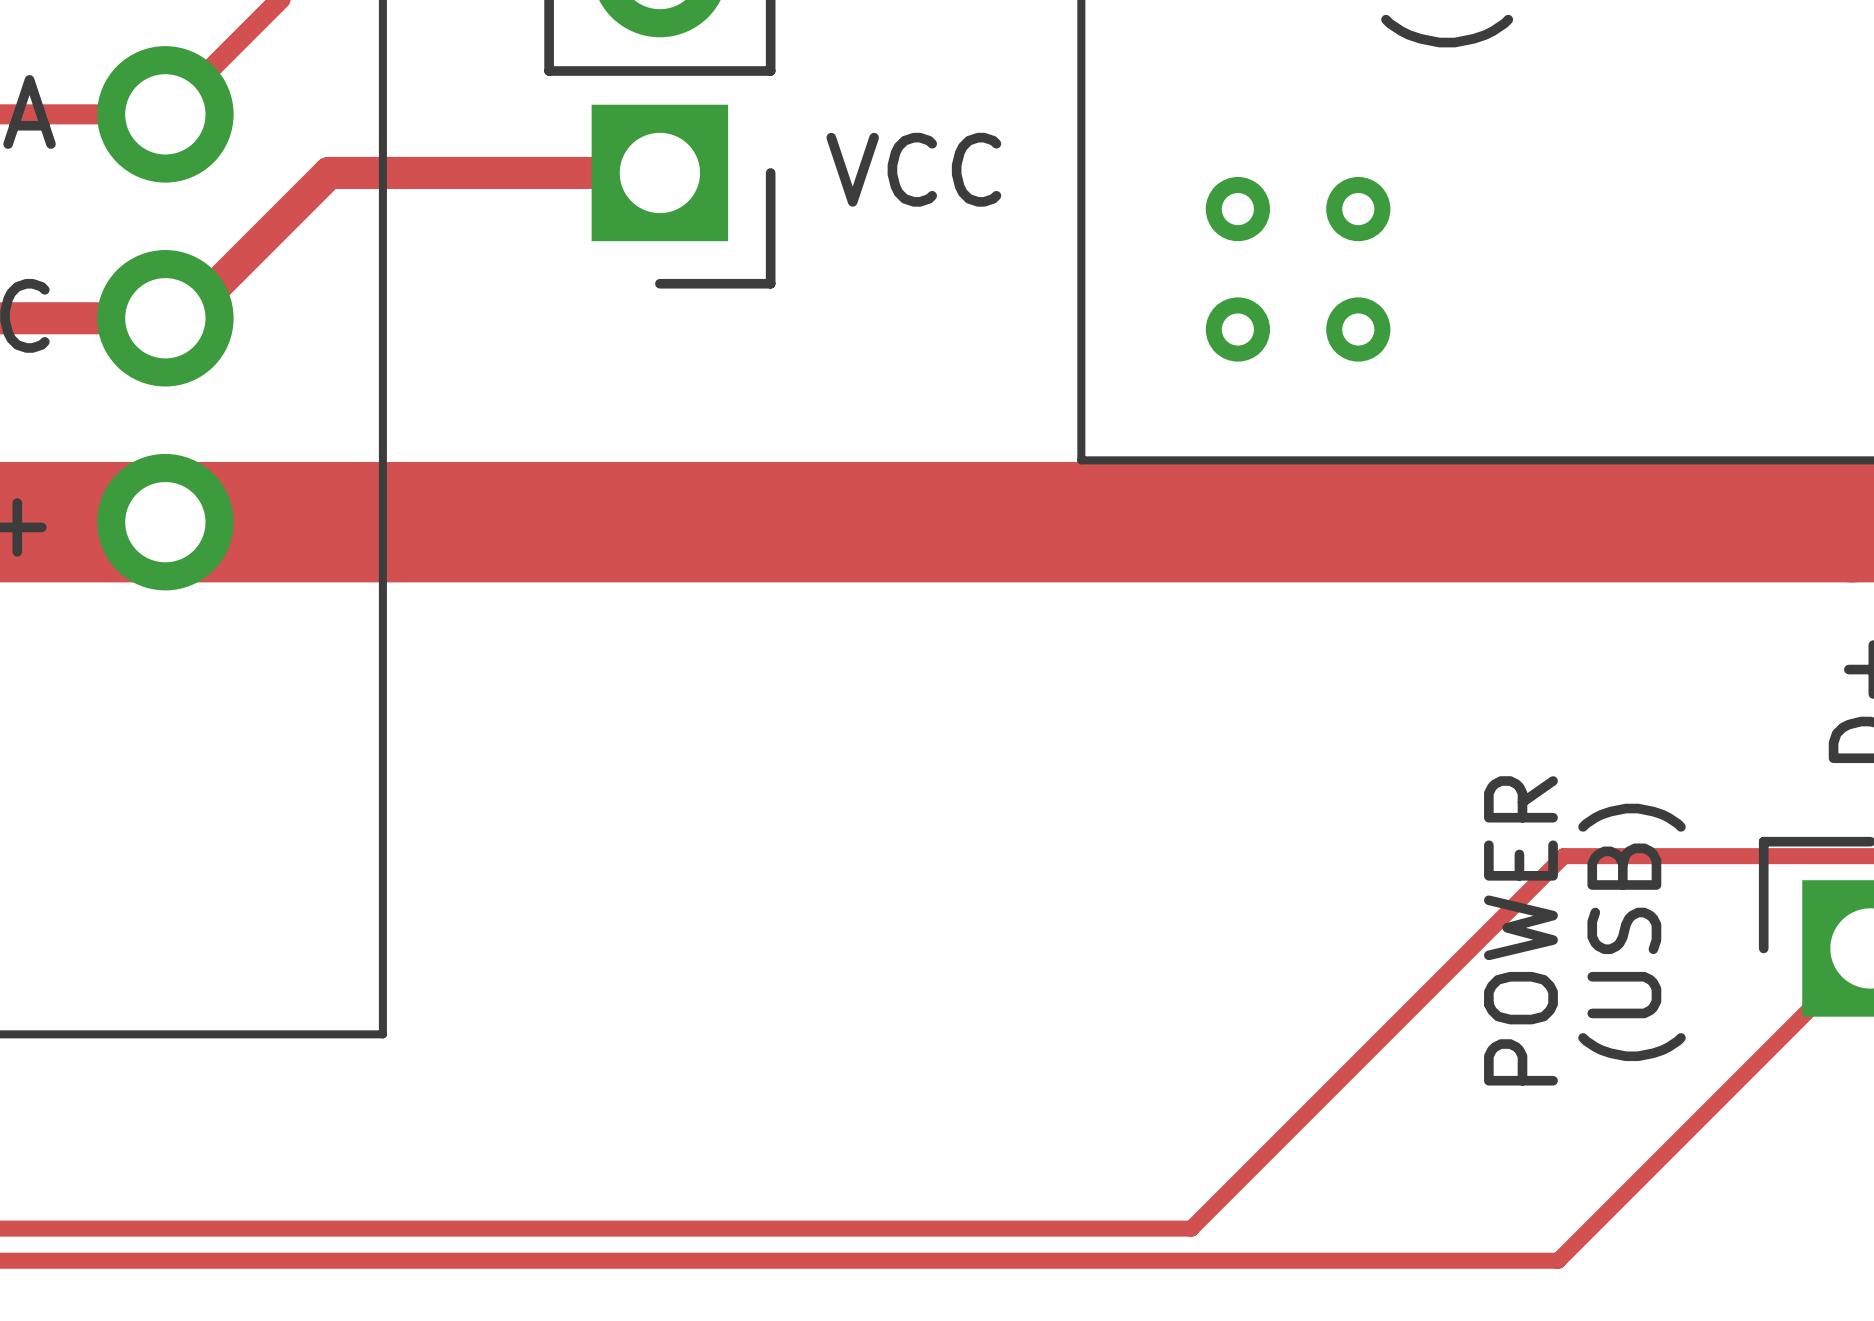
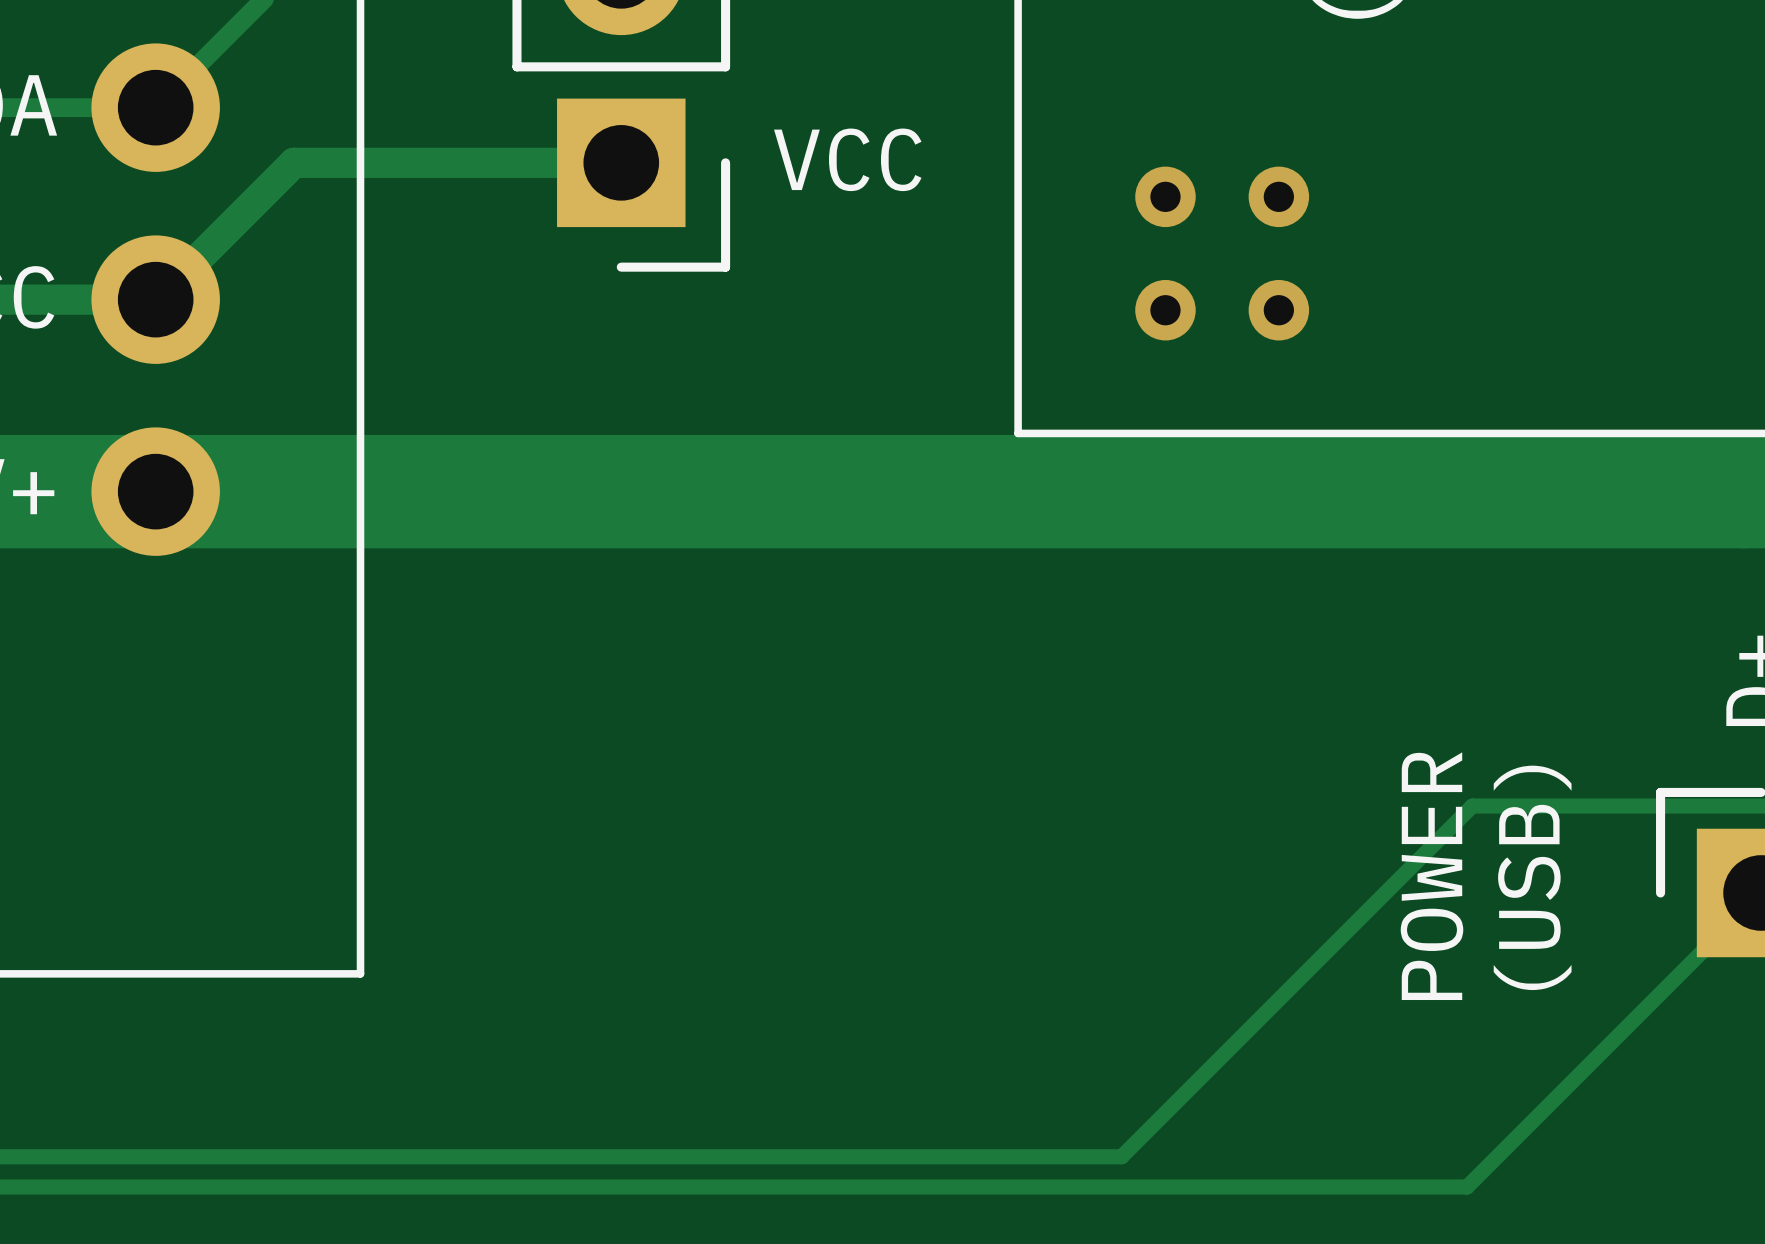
track: (329, 172) (183, 318) -> (309, 162) (294, 162) (157, 299)

